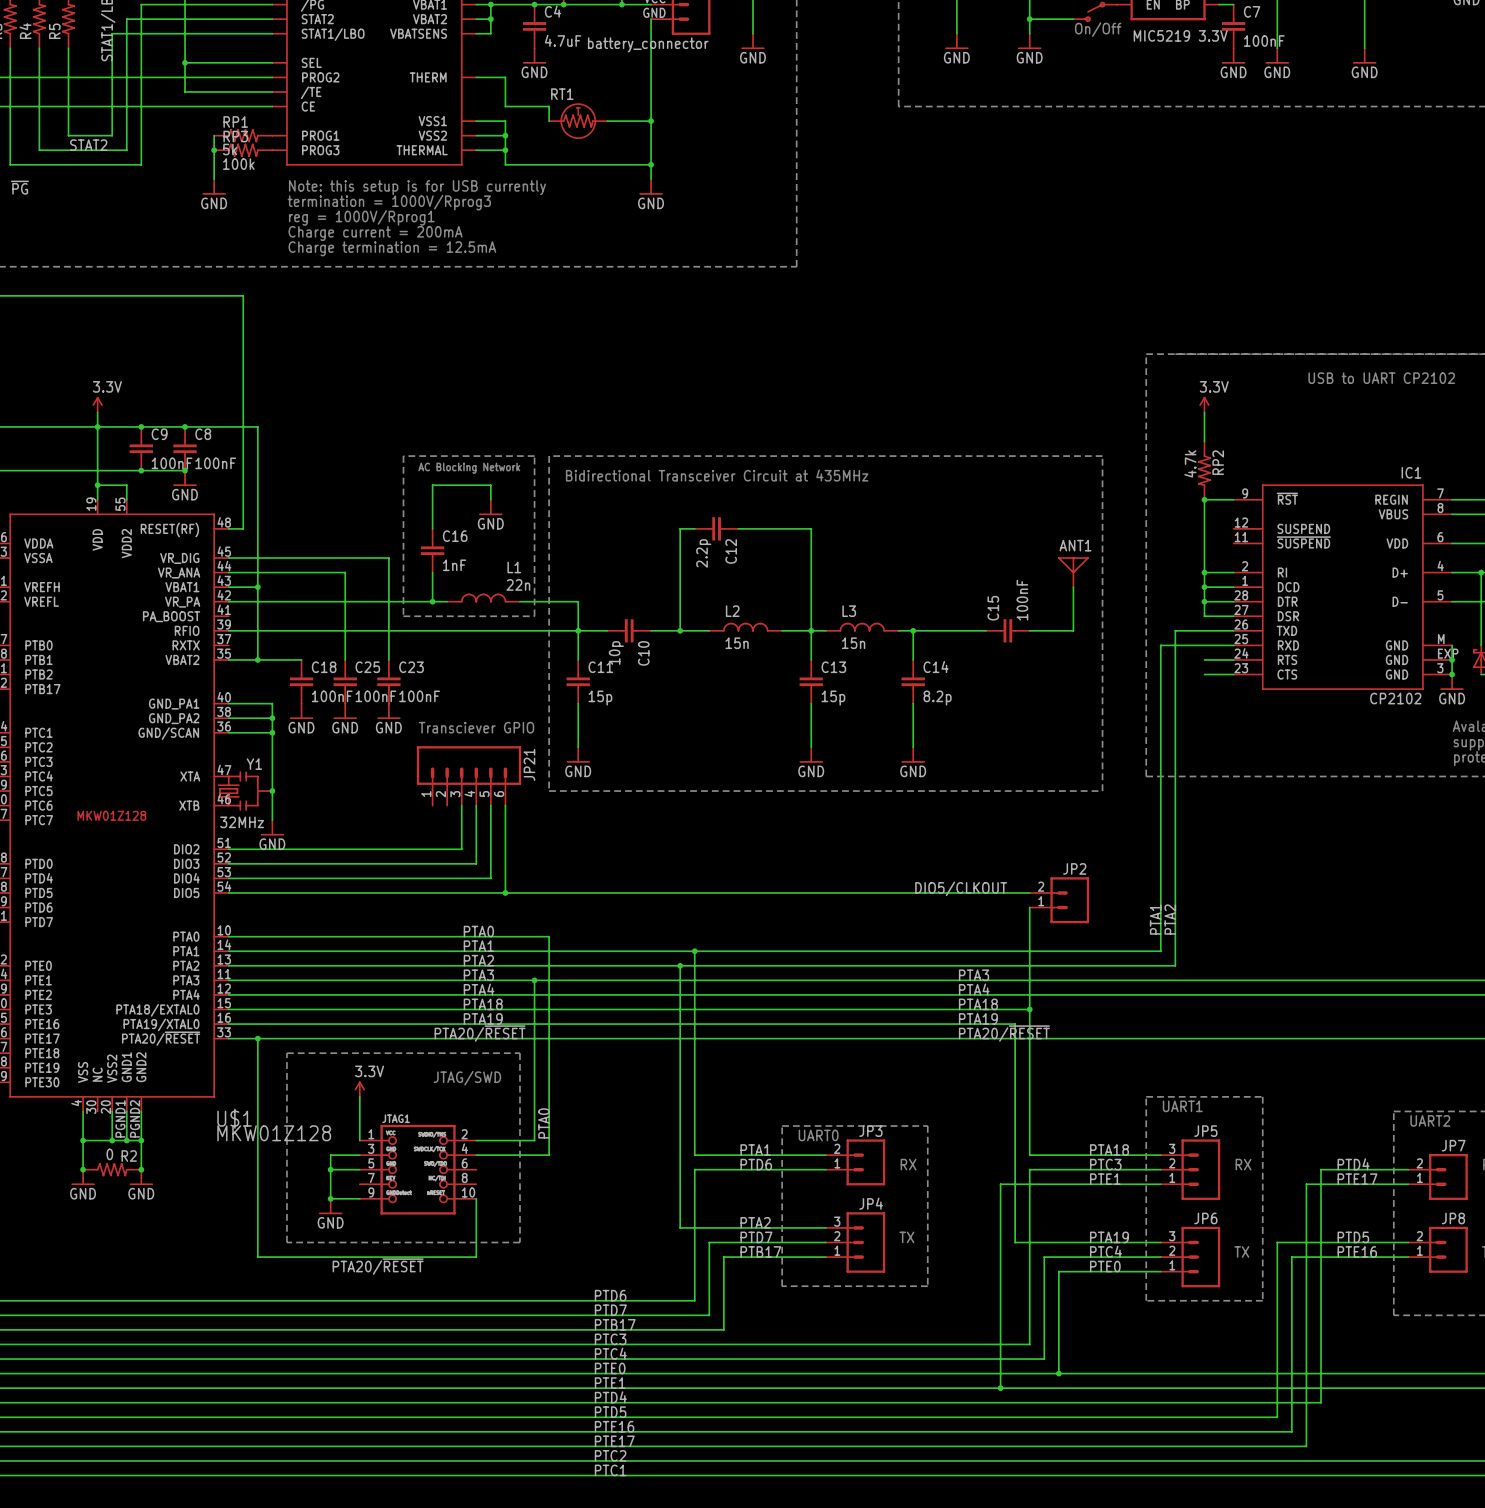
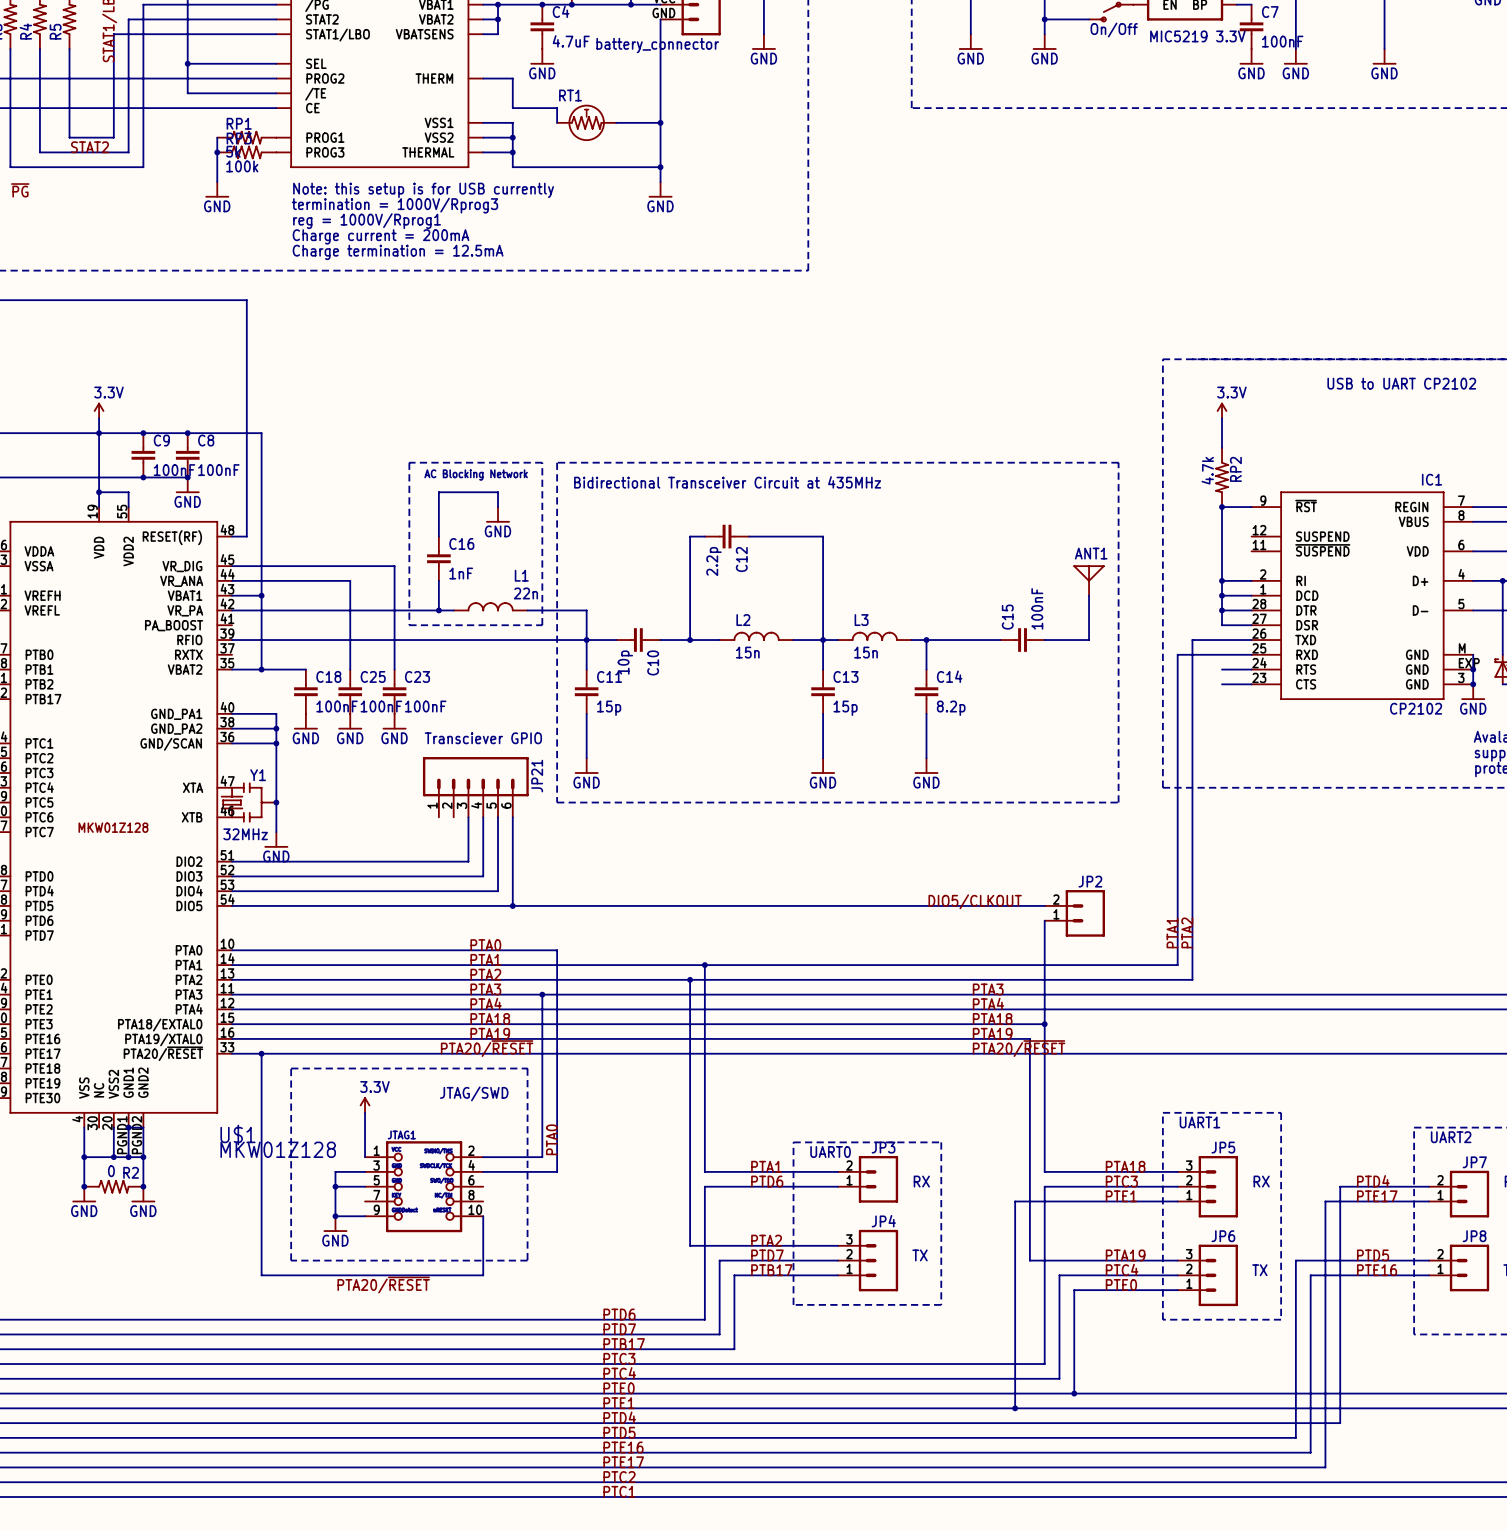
wire: none -> (128, 1127) (143, 1127)
junction: none -> (128, 1127)

